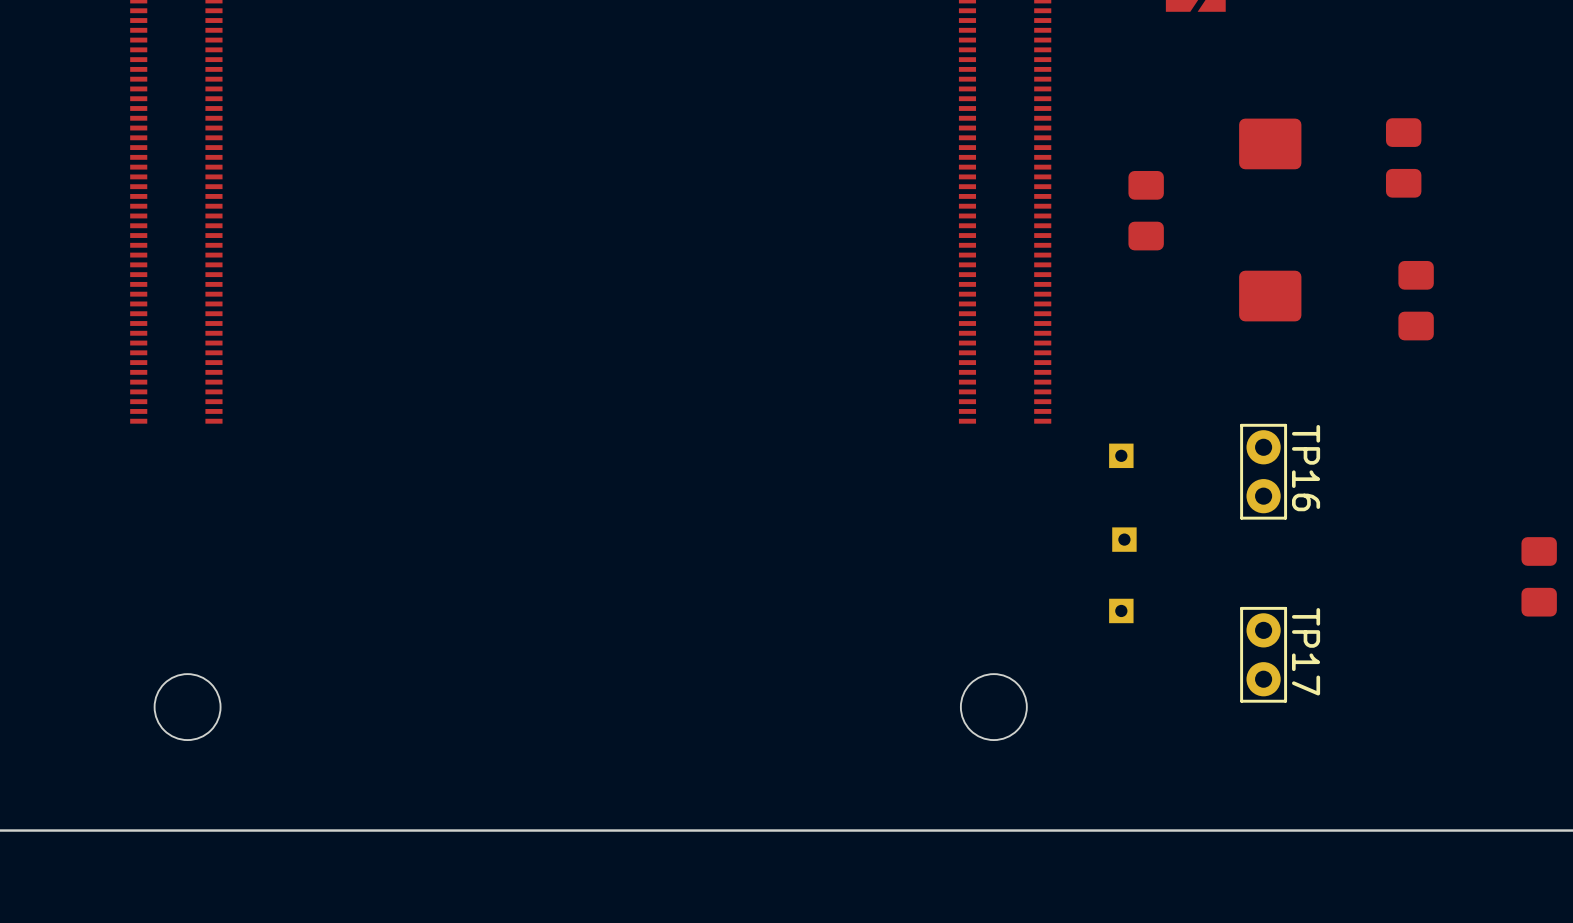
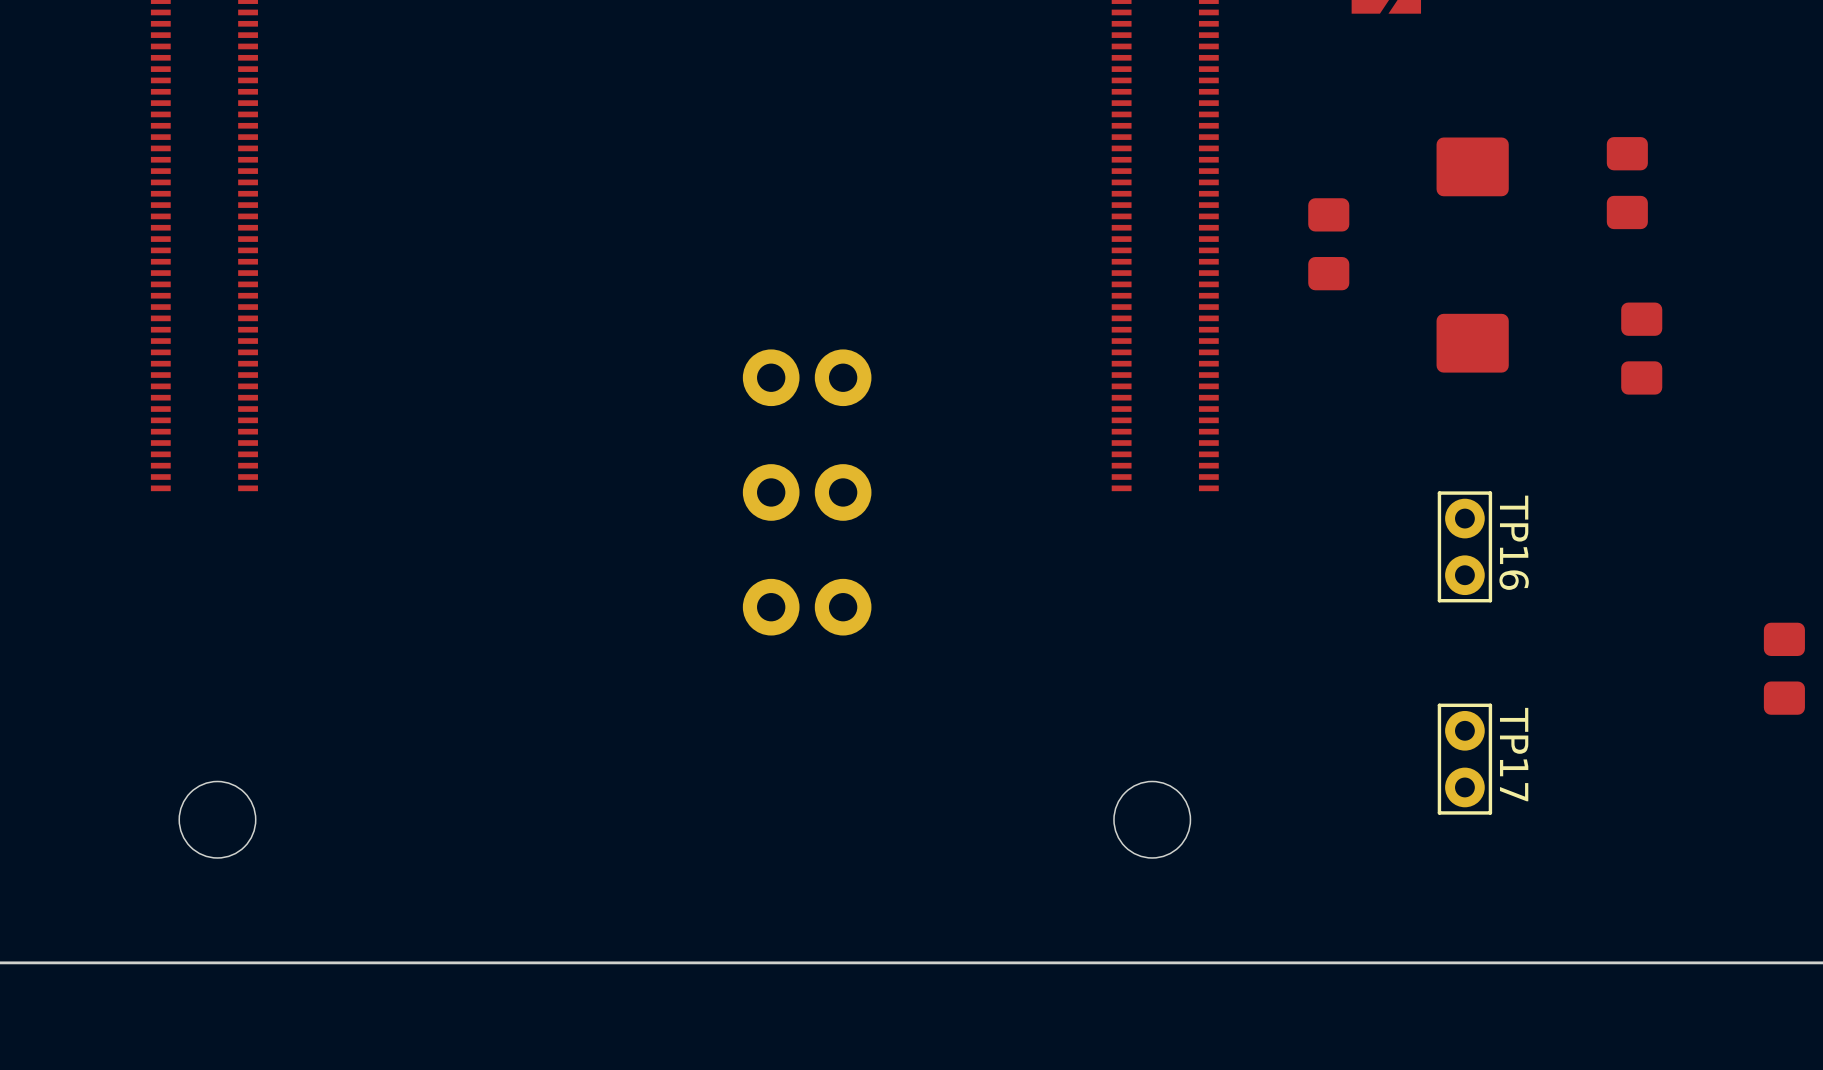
part: none -> (807, 377)
part: none -> (807, 492)
part: (1121, 455) -> none
part: none -> (807, 607)
part: (1124, 539) -> none
part: (1121, 610) -> none

